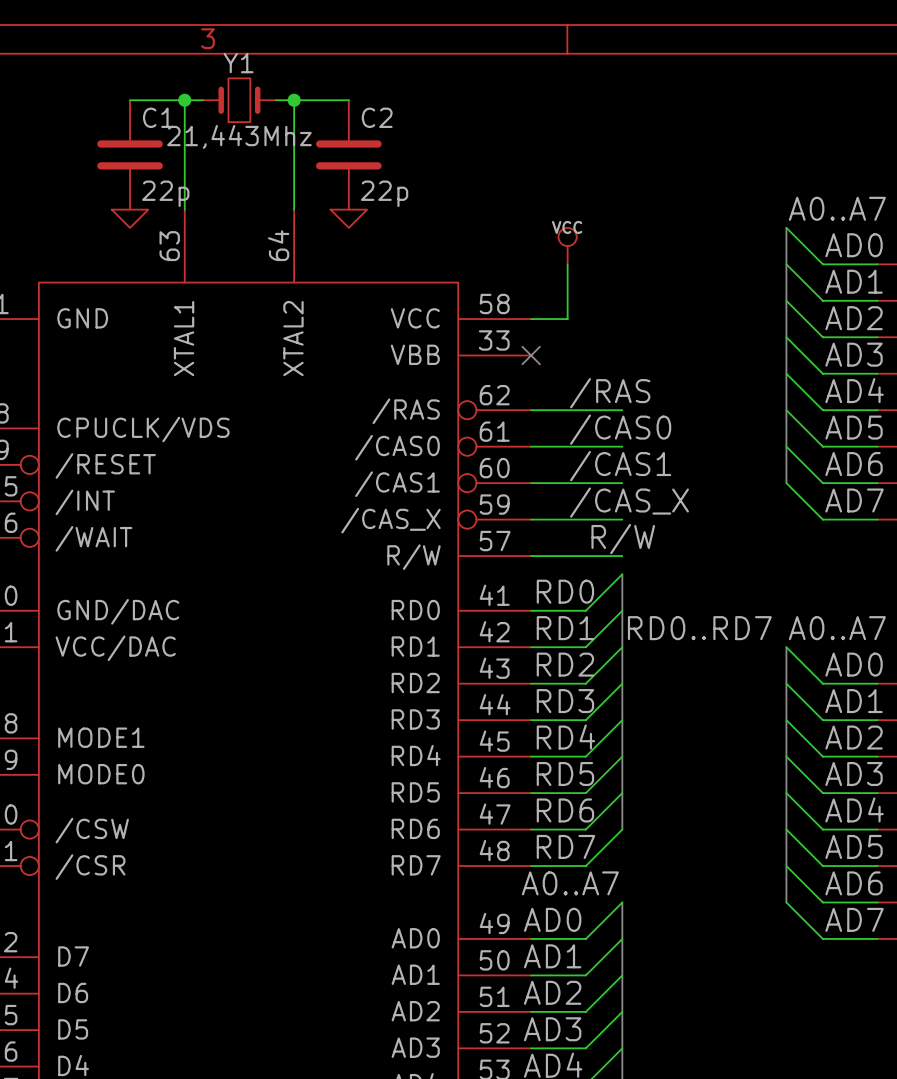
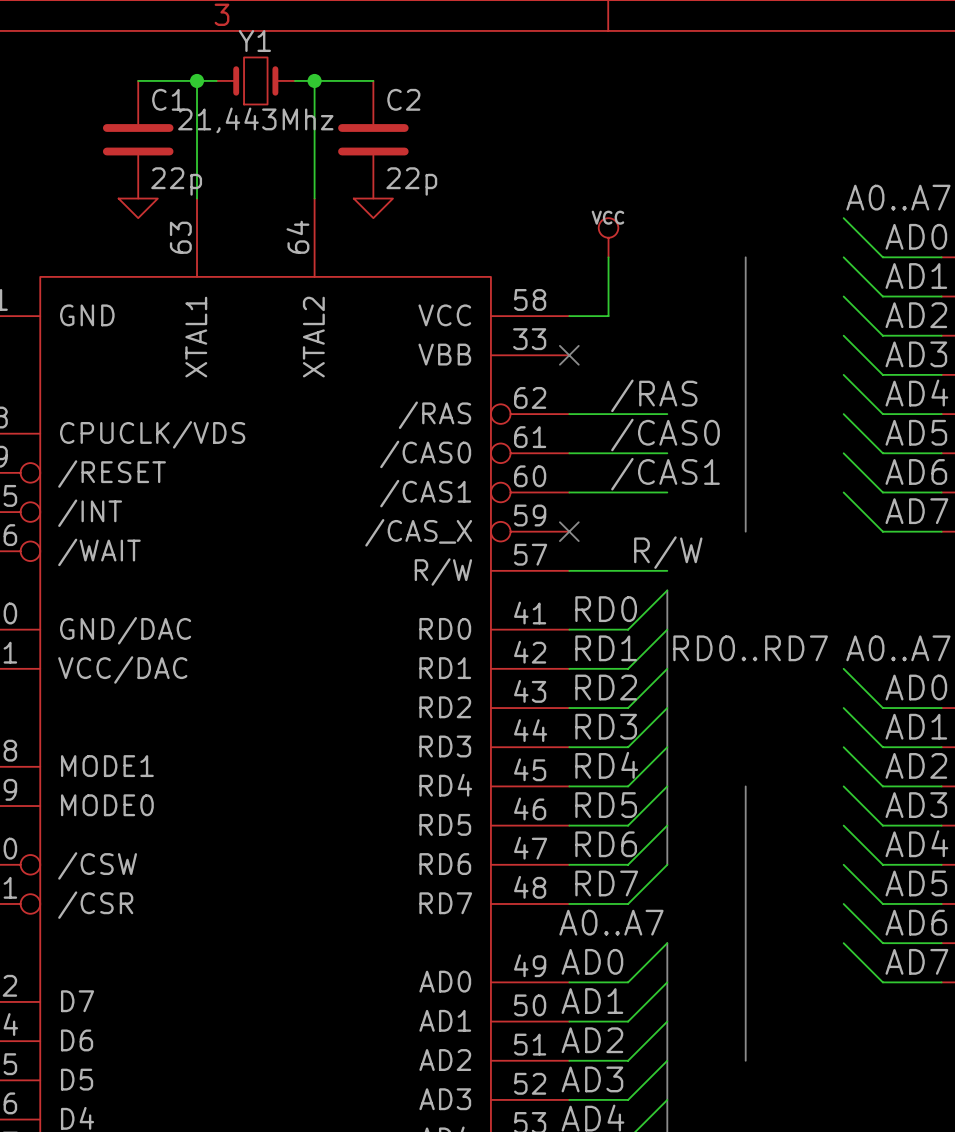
bus: (786, 227) (786, 483) -> (745, 257) (745, 531)
label: /CAS_X (629, 502) -> none
wire: (531, 519) (622, 519) -> none
no-connect mark: none -> (569, 531)
bus: (786, 647) (786, 902) -> (745, 786) (745, 1060)

